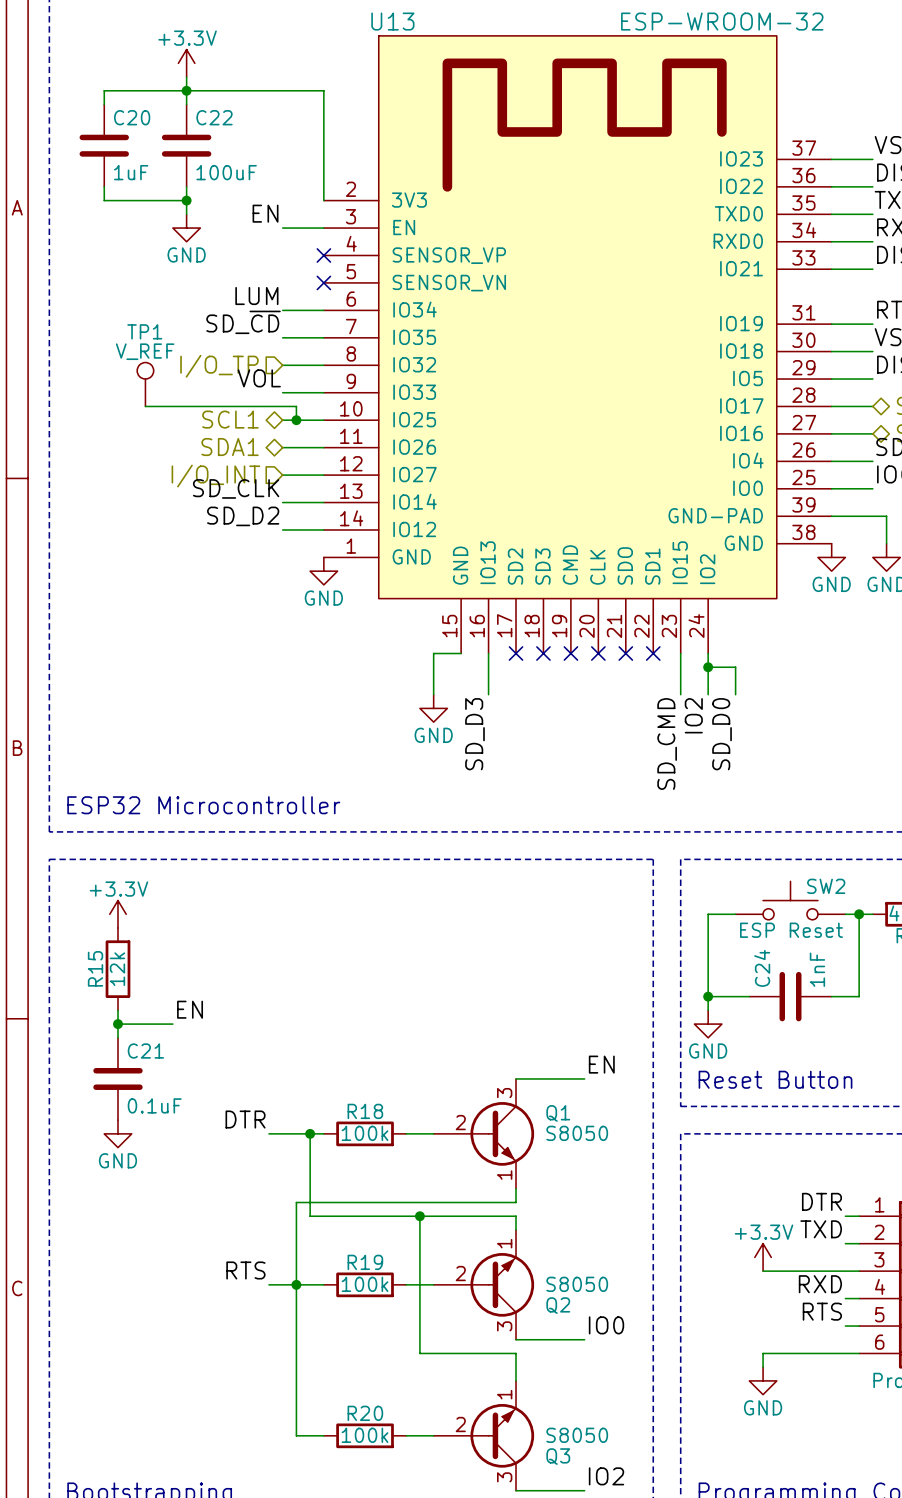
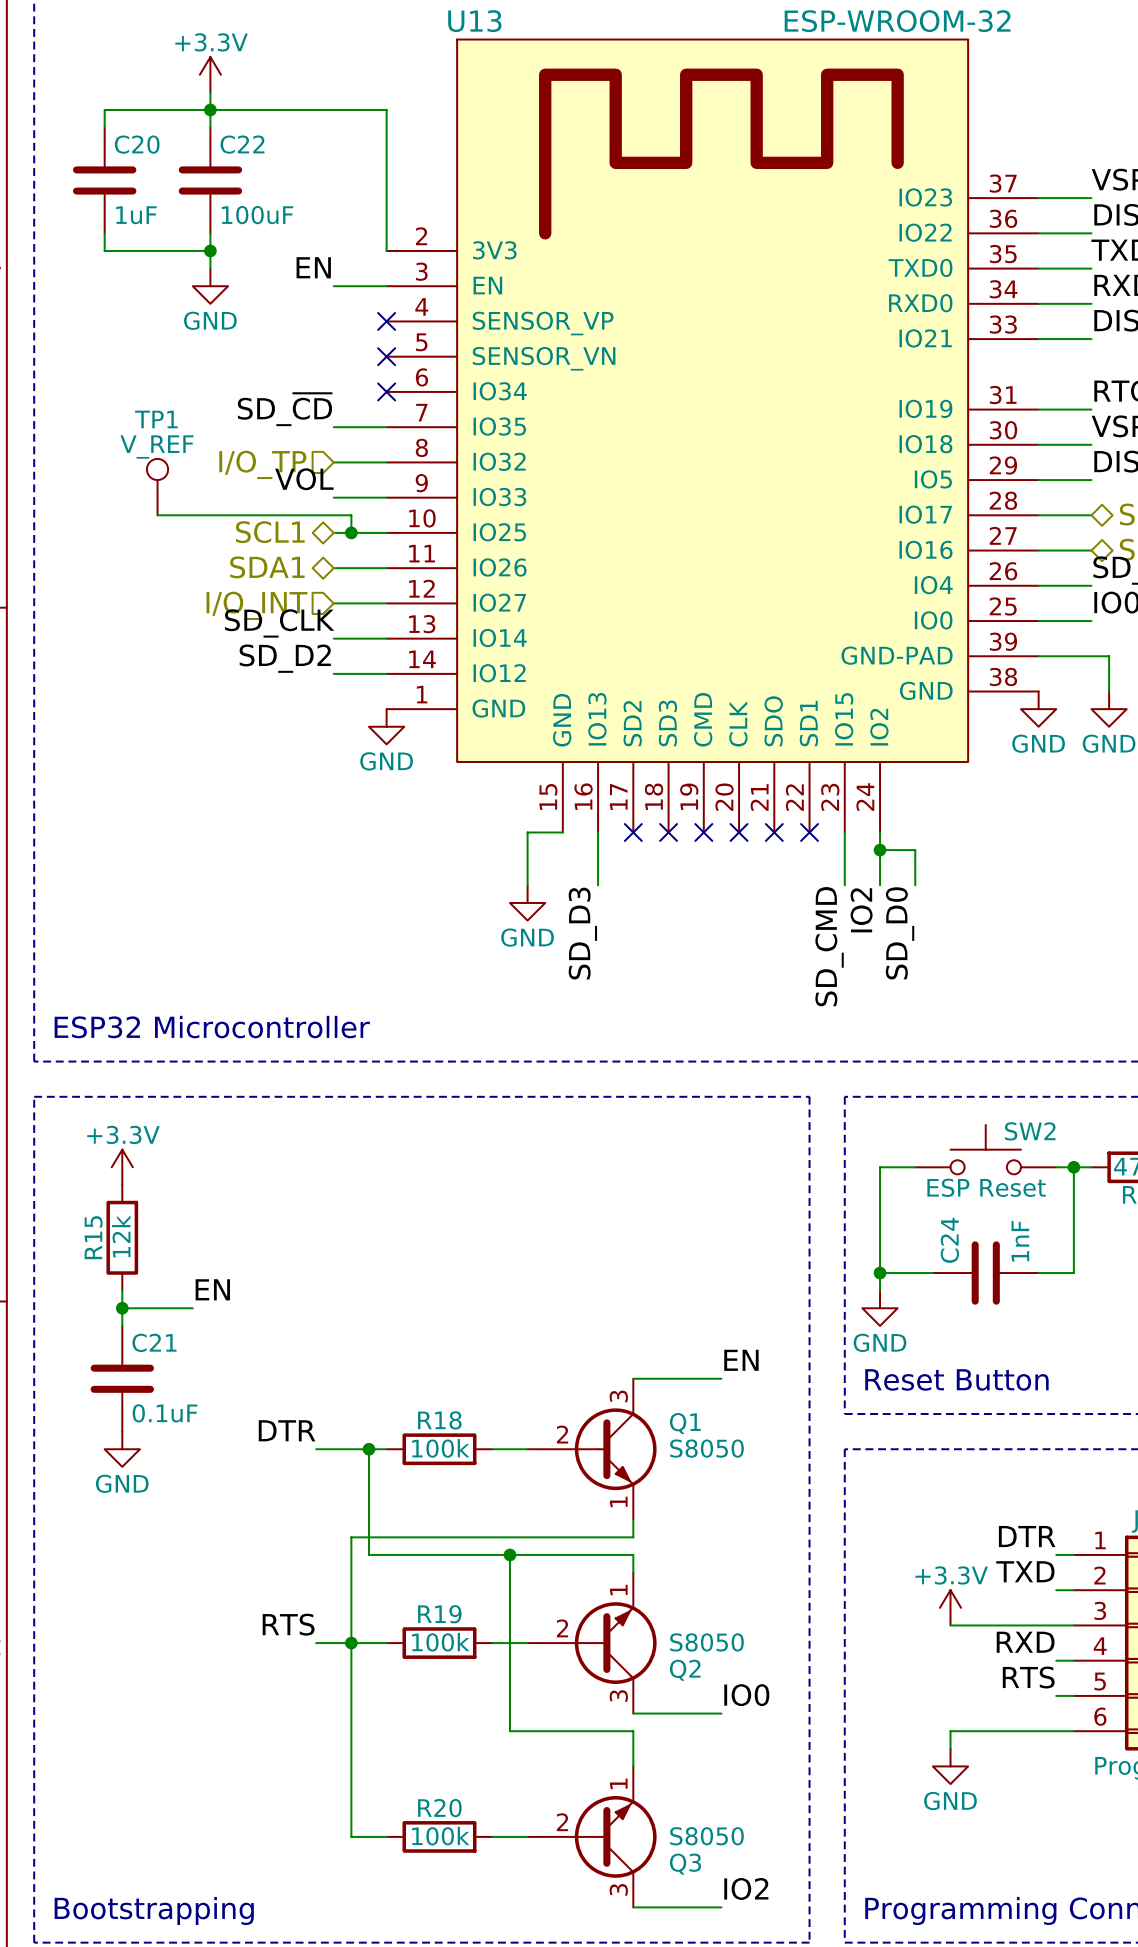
label: LUM (256, 296) -> none
wire: (282, 310) (323, 310) -> none
no-connect mark: none -> (386, 391)

